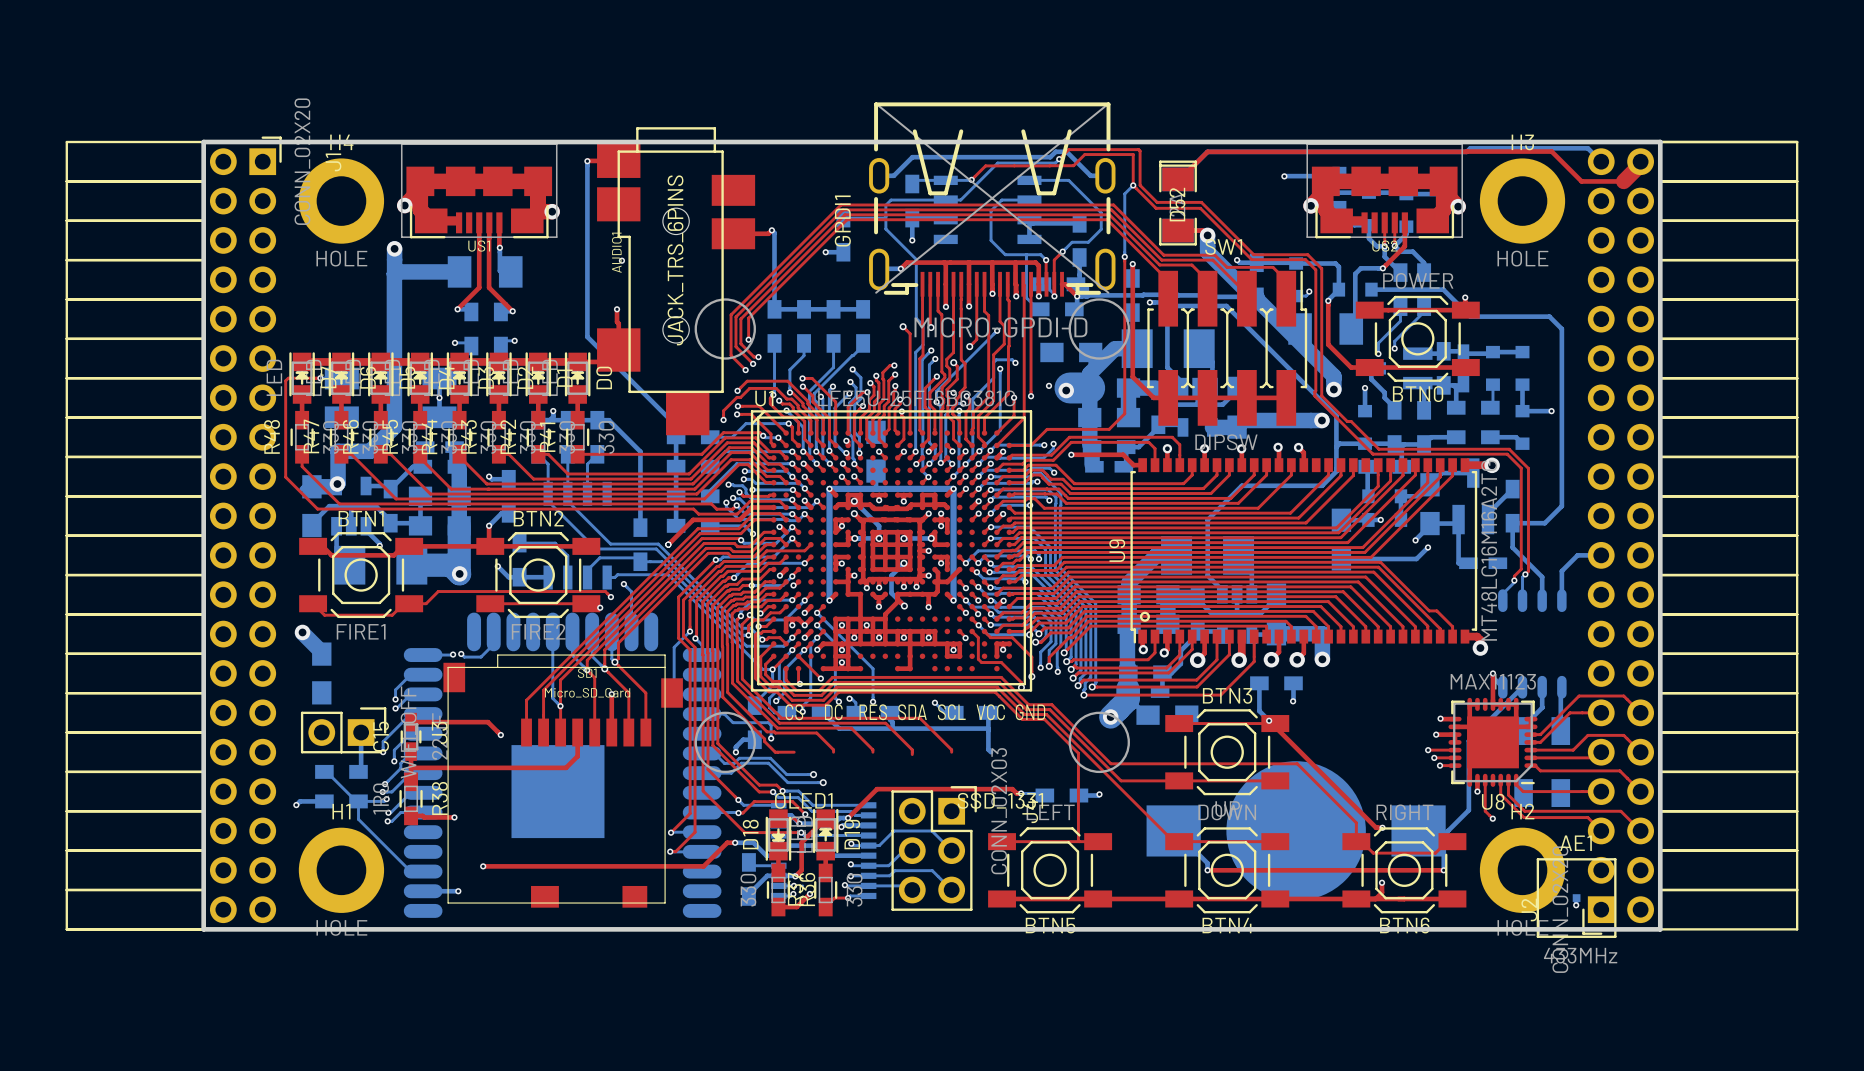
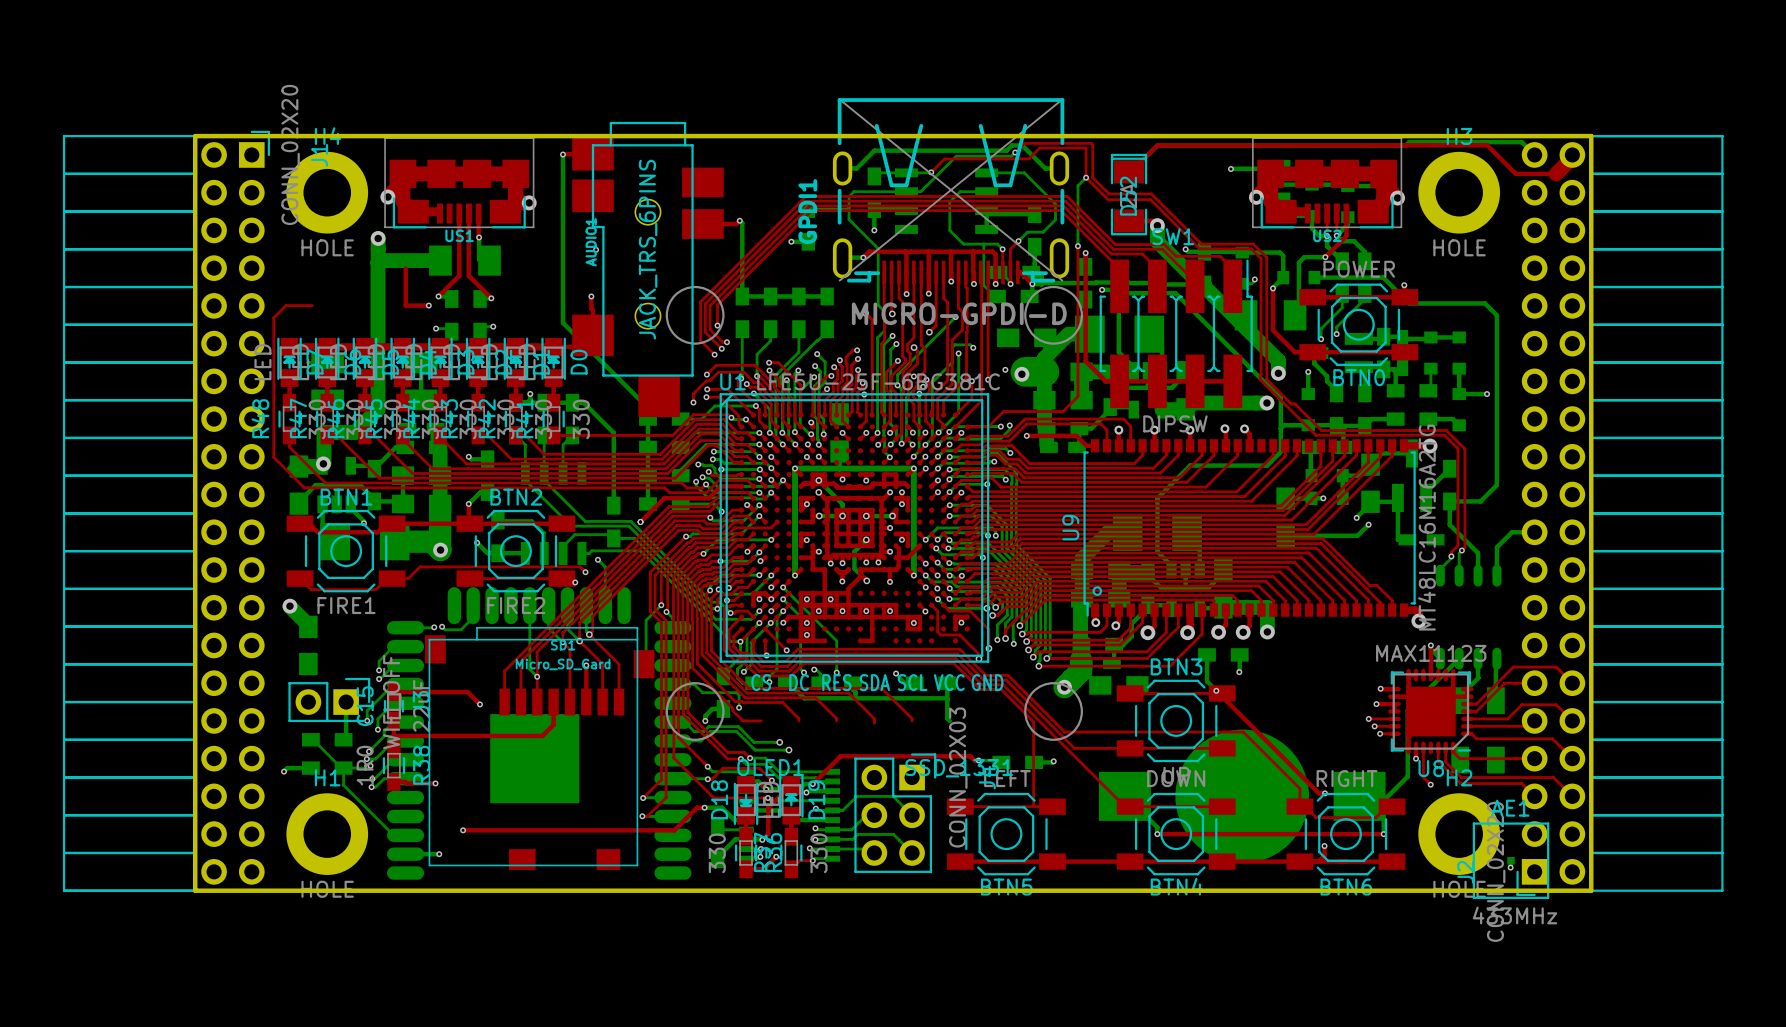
top track: none -> (405, 268) (405, 305) (428, 305)
via: none -> (428, 305)
top track: (320, 378) (288, 378) (285, 380) -> (312, 305) (286, 305) (273, 317) (273, 365)
via: (320, 378) -> none
via: (439, 397) -> none

